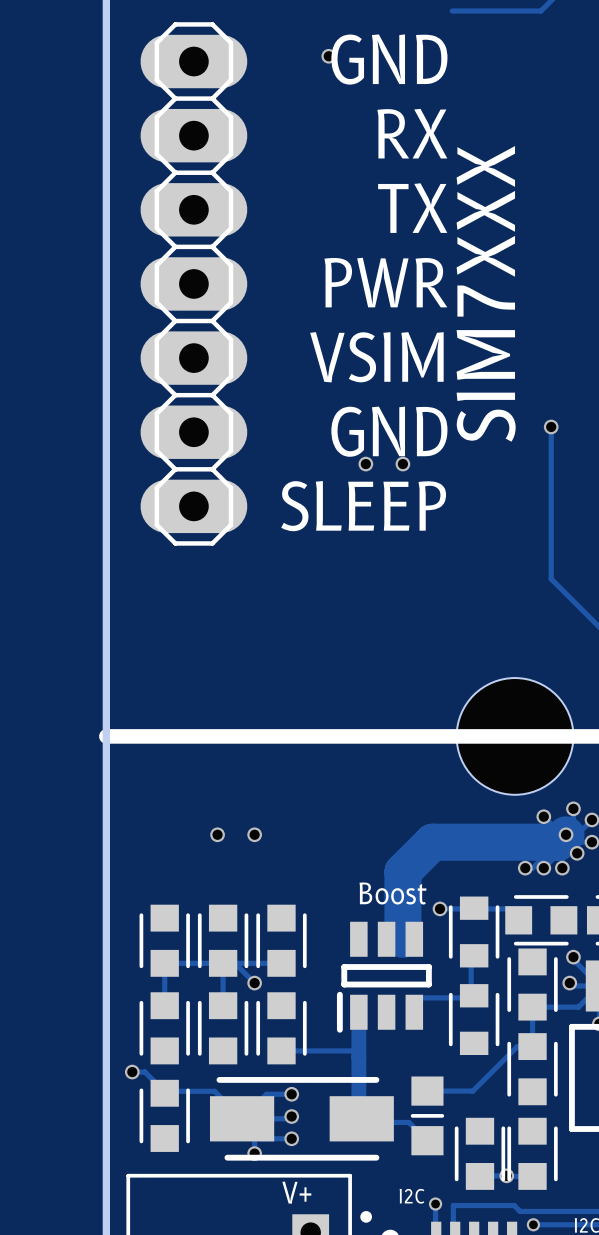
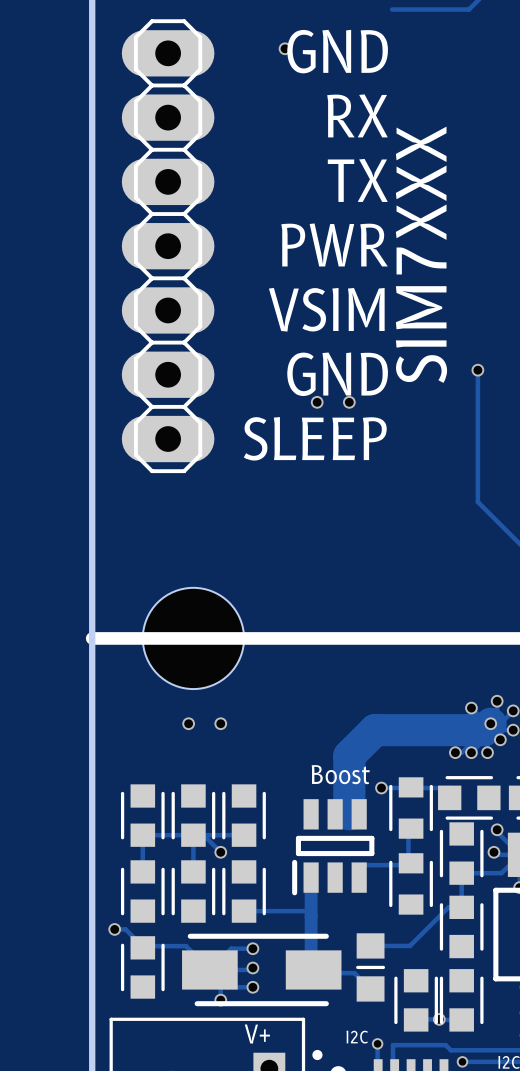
hole position: (515, 736) -> (193, 638)

